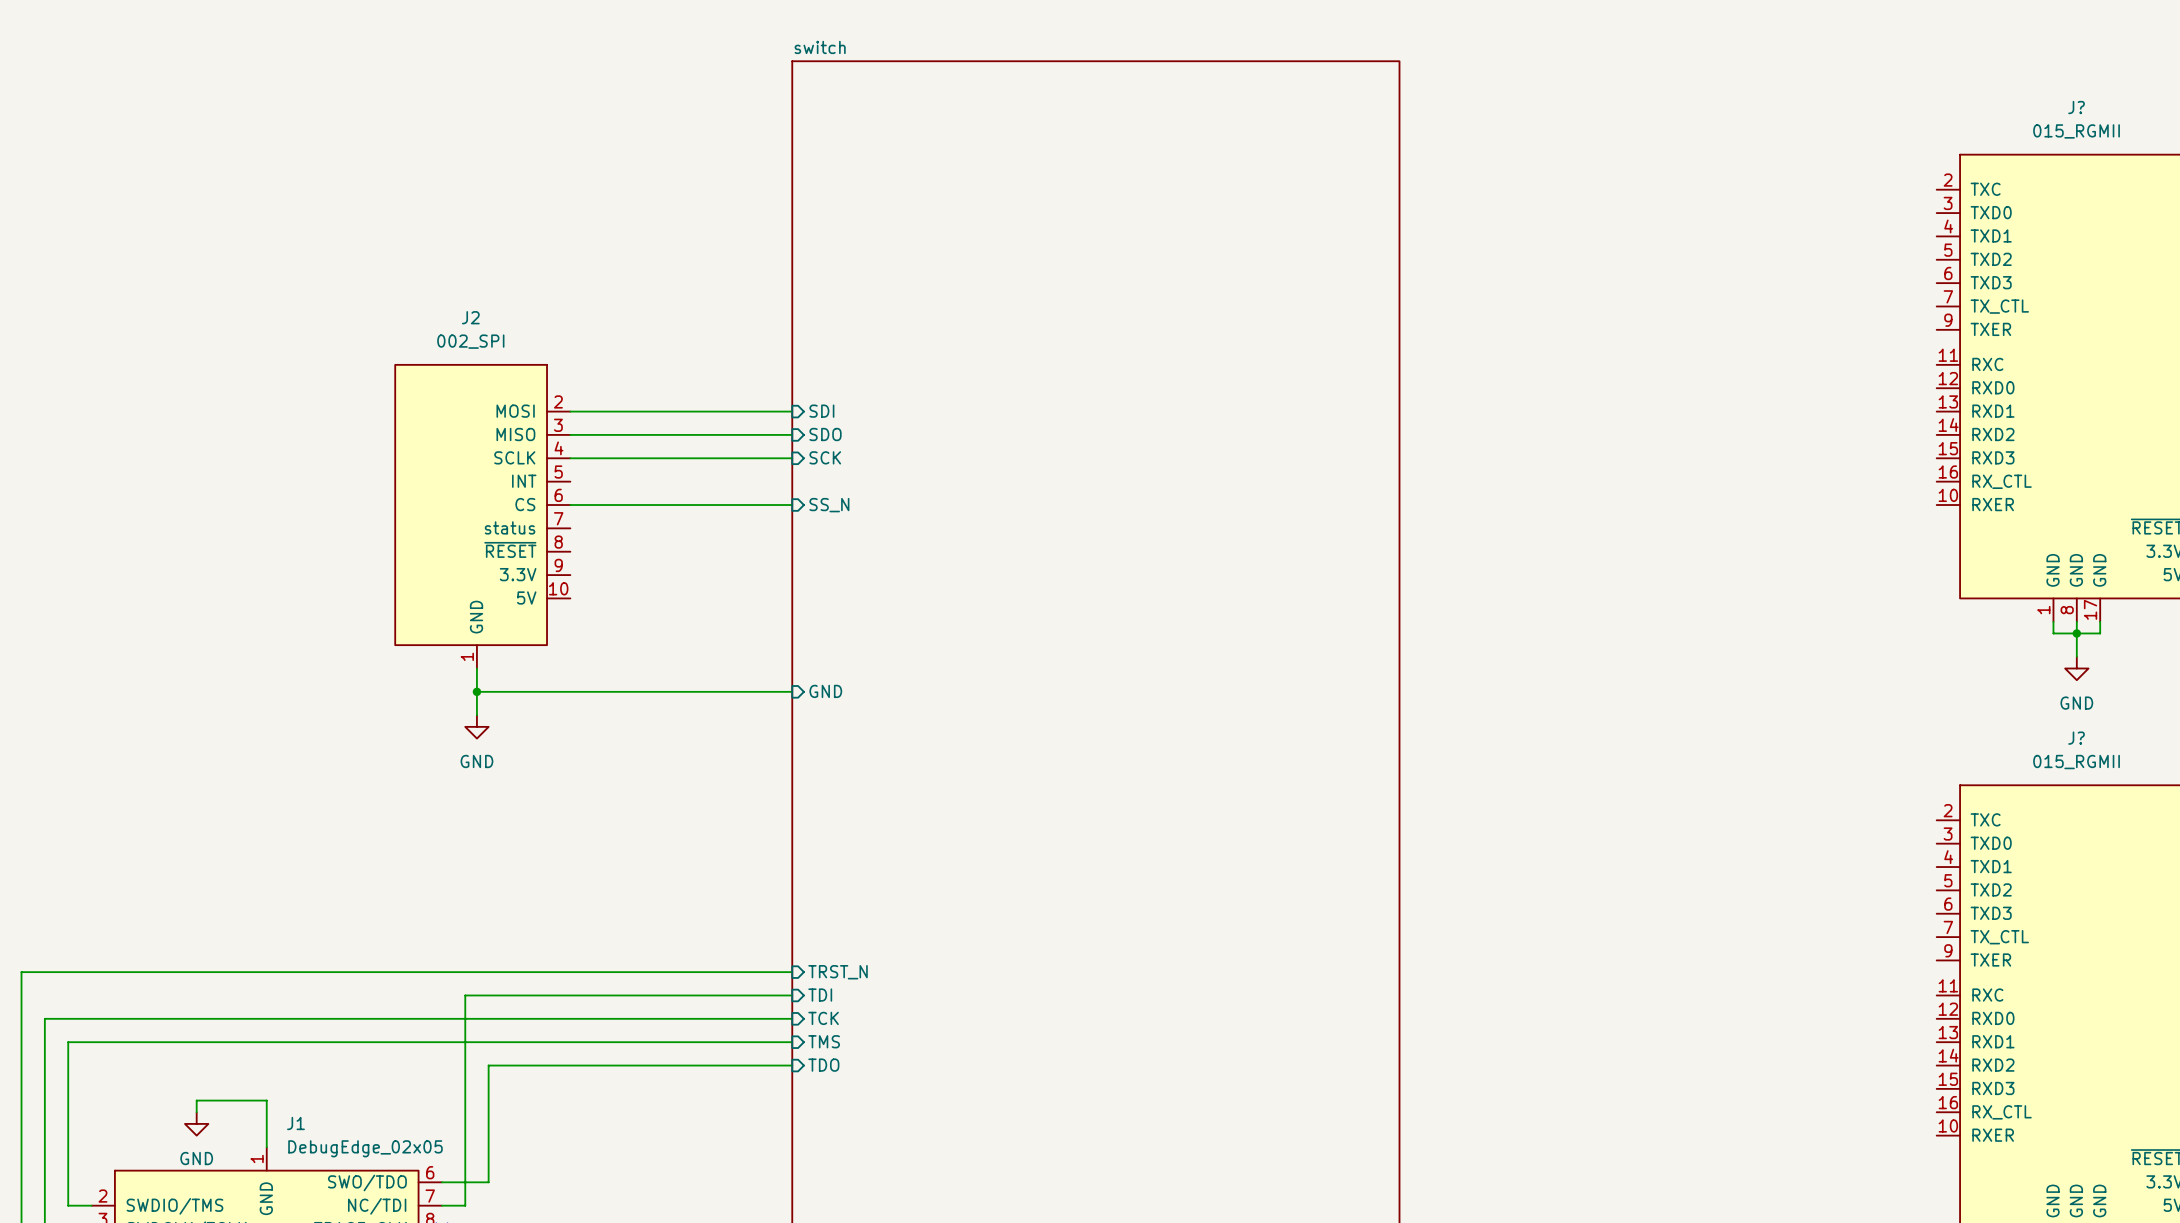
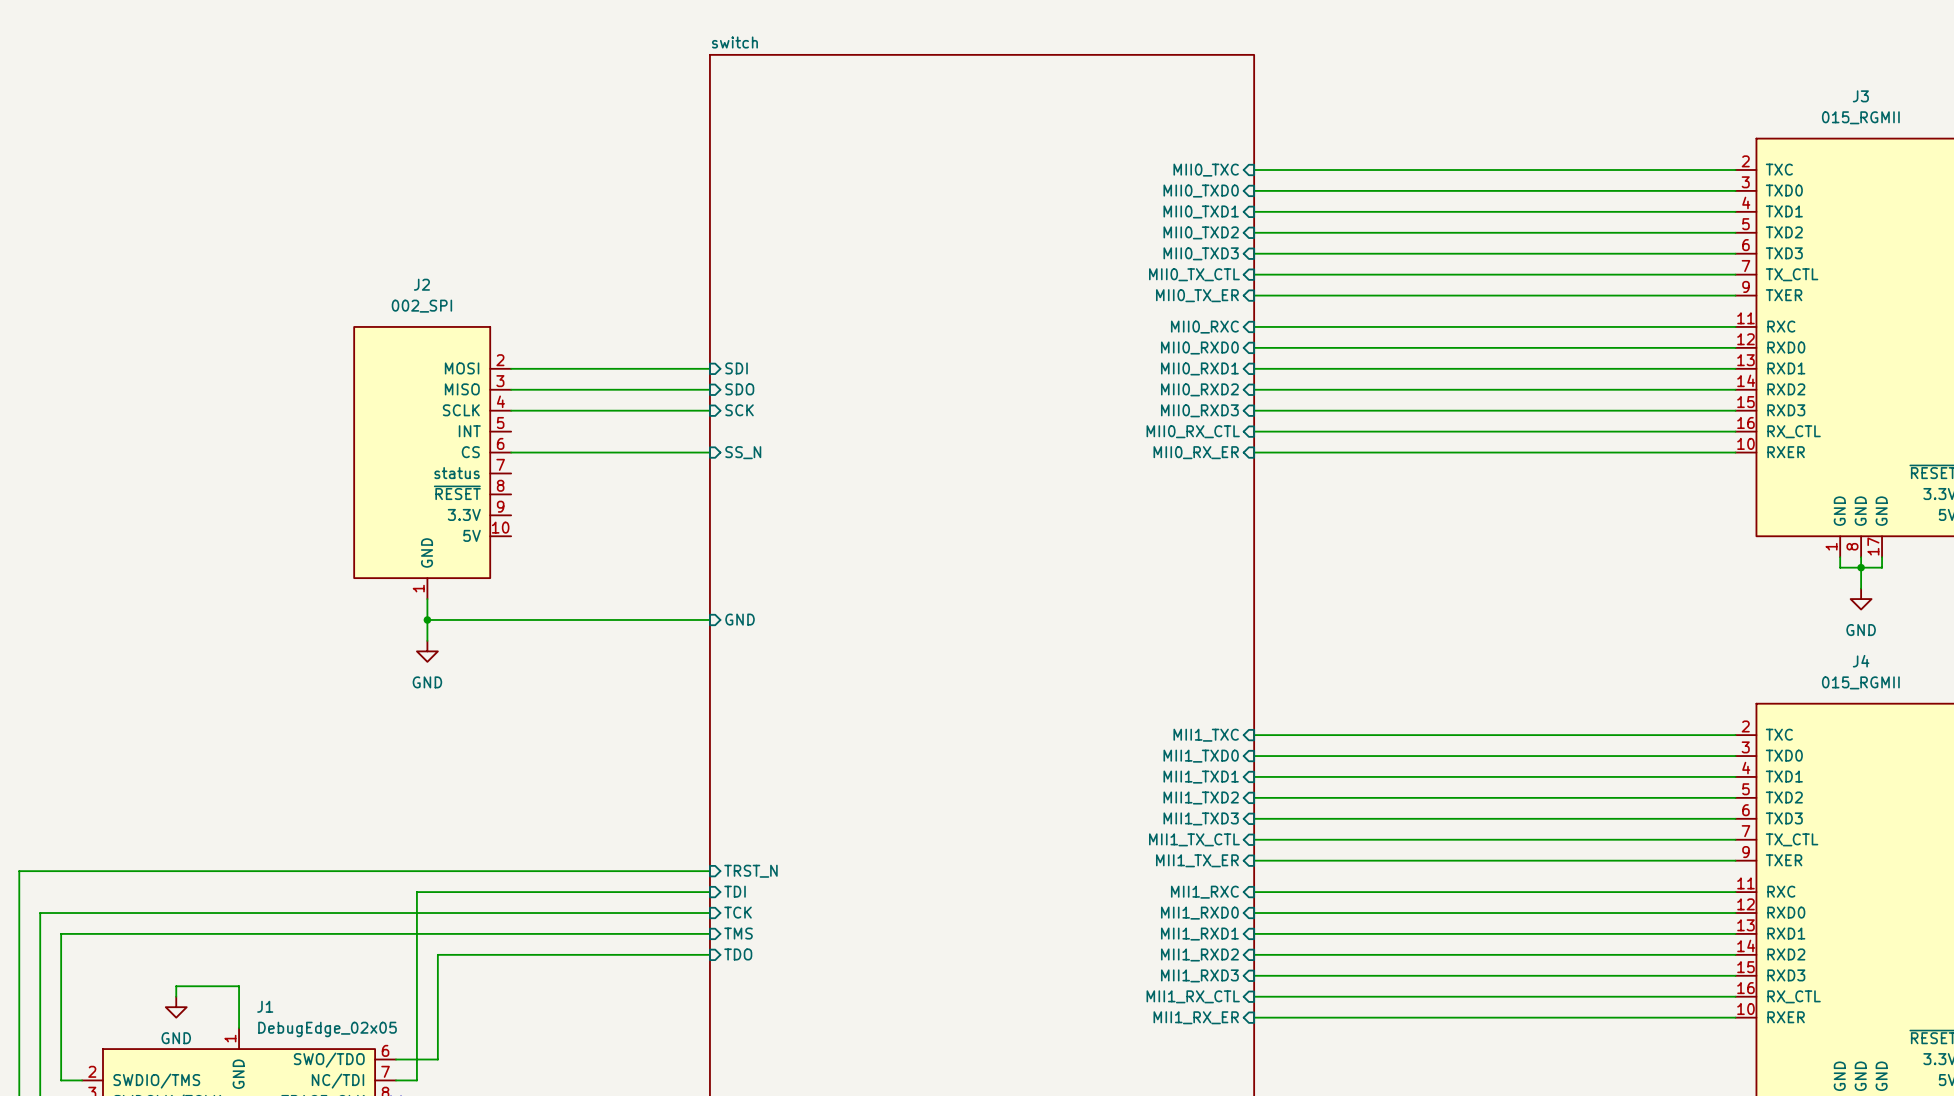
J? name: J? (2076, 107) -> J3 (1860, 96)
sheet pin: none -> MII0_TXC (1206, 170)
wire: none -> (1254, 170) (1735, 170)
sheet pin: none -> MII0_TXD0 (1201, 191)
wire: none -> (1254, 190) (1735, 190)
sheet pin: none -> MII0_TXD1 (1201, 211)
wire: none -> (1254, 211) (1735, 211)
sheet pin: none -> MII0_TXD2 (1201, 232)
wire: none -> (1254, 232) (1735, 232)
sheet pin: none -> MII0_TXD3 (1201, 253)
wire: none -> (1254, 253) (1735, 253)
sheet pin: none -> MII0_TX_CTL (1194, 274)
wire: none -> (1254, 274) (1735, 274)
sheet pin: none -> MII0_TX_ER (1197, 295)
wire: none -> (1254, 295) (1735, 295)
sheet pin: none -> MII0_RXC (1204, 327)
wire: none -> (1254, 326) (1735, 326)
sheet pin: none -> MII0_RXD0 (1199, 348)
wire: none -> (1254, 347) (1735, 347)
sheet pin: none -> MII0_RXD1 (1199, 368)
wire: none -> (1254, 368) (1735, 368)
wire: none -> (1254, 389) (1735, 389)
sheet pin: none -> MII0_RXD2 (1199, 389)
sheet pin: none -> MII0_RXD3 (1199, 410)
wire: none -> (1254, 410) (1735, 410)
sheet pin: none -> MII0_RX_CTL (1193, 431)
wire: none -> (1254, 431) (1735, 431)
sheet pin: none -> MII0_RX_ER (1196, 452)
wire: none -> (1254, 452) (1735, 452)
J? name: J? (2076, 738) -> J4 (1861, 661)
sheet pin: none -> MII1_TXC (1206, 735)
wire: none -> (1254, 735) (1735, 735)
sheet pin: none -> MII1_TXD0 (1201, 756)
wire: none -> (1254, 756) (1735, 756)
sheet pin: none -> MII1_TXD1 (1201, 777)
wire: none -> (1254, 776) (1735, 776)
sheet pin: none -> MII1_TXD2 (1201, 798)
wire: none -> (1254, 797) (1735, 797)
sheet pin: none -> MII1_TXD3 (1201, 818)
wire: none -> (1254, 818) (1735, 818)
sheet pin: none -> MII1_TX_CTL (1194, 839)
wire: none -> (1254, 839) (1735, 839)
sheet pin: none -> MII1_TX_ER (1197, 860)
wire: none -> (1254, 860) (1735, 860)
sheet pin: none -> MII1_RXC (1204, 892)
wire: none -> (1254, 892) (1735, 892)
sheet pin: none -> MII1_RXD0 (1199, 913)
wire: none -> (1254, 913) (1735, 913)
sheet pin: none -> MII1_RXD1 (1199, 934)
wire: none -> (1254, 933) (1735, 933)
sheet pin: none -> MII1_RXD2 (1199, 954)
wire: none -> (1254, 954) (1735, 954)
wire: none -> (1254, 975) (1735, 975)
sheet pin: none -> MII1_RXD3 (1199, 975)
sheet pin: none -> MII1_RX_CTL (1193, 996)
wire: none -> (1254, 996) (1735, 996)
sheet pin: none -> MII1_RX_ER (1196, 1017)
wire: none -> (1254, 1017) (1735, 1017)

